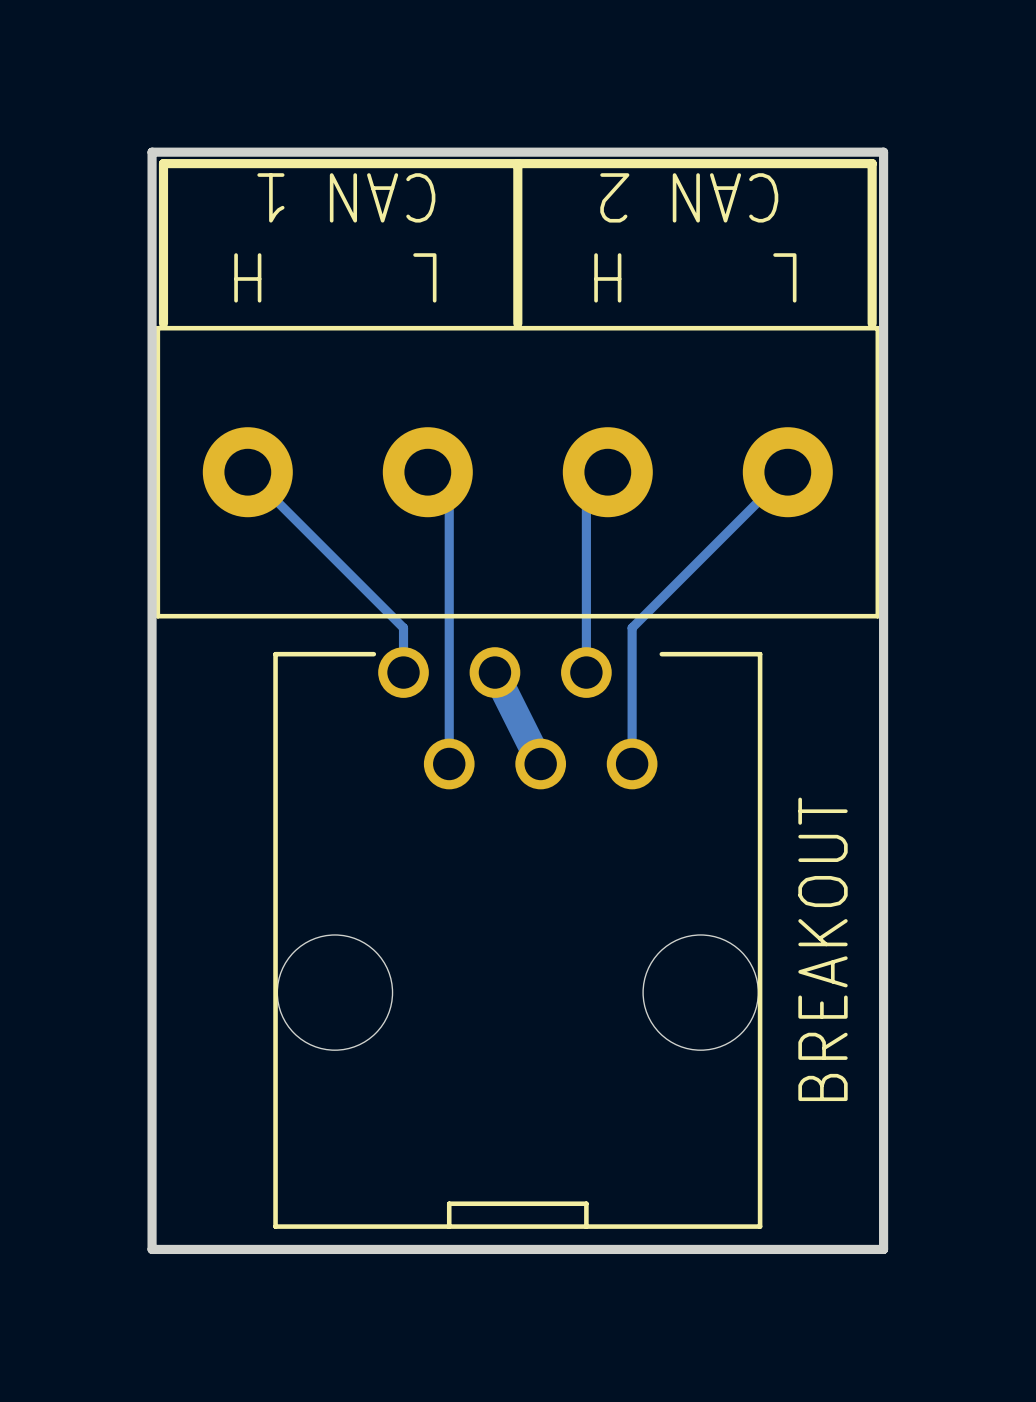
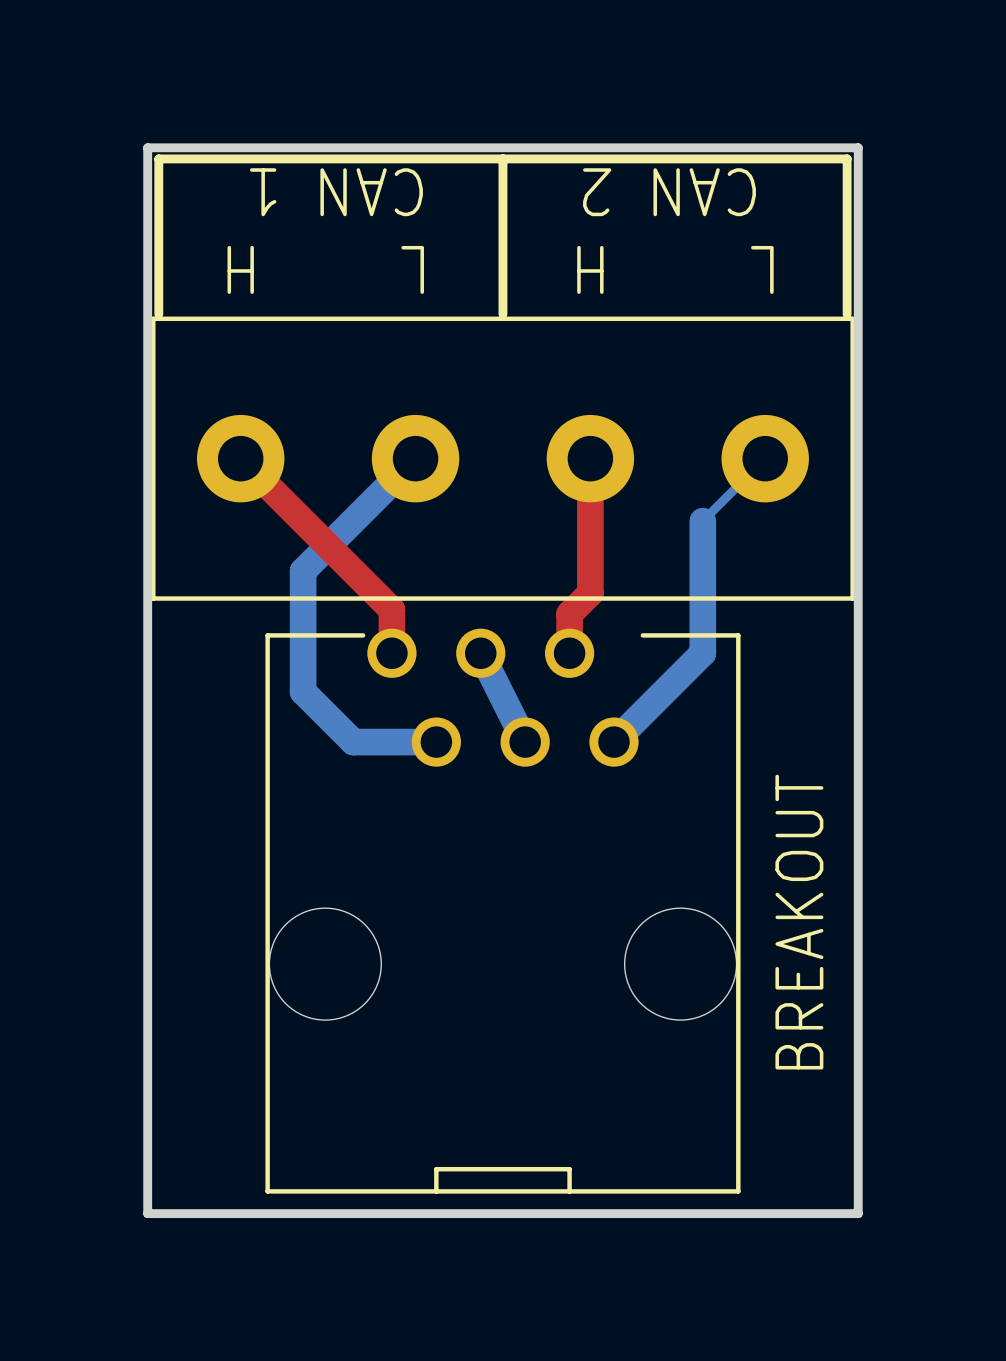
bottom track: (247, 472) (403, 627) (403, 672) -> none
top track: none -> (240, 458) (391, 609) (391, 653)
bottom track: (427, 472) (449, 493) (449, 763) -> (415, 458) (303, 571) (303, 691) (353, 742) (436, 742)
bottom track: (607, 472) (586, 493) (586, 672) -> none
top track: none -> (590, 458) (590, 593) (569, 614) (569, 653)
bottom track: (723, 536) (632, 627) (632, 763) -> (702, 521) (702, 653) (613, 742)

